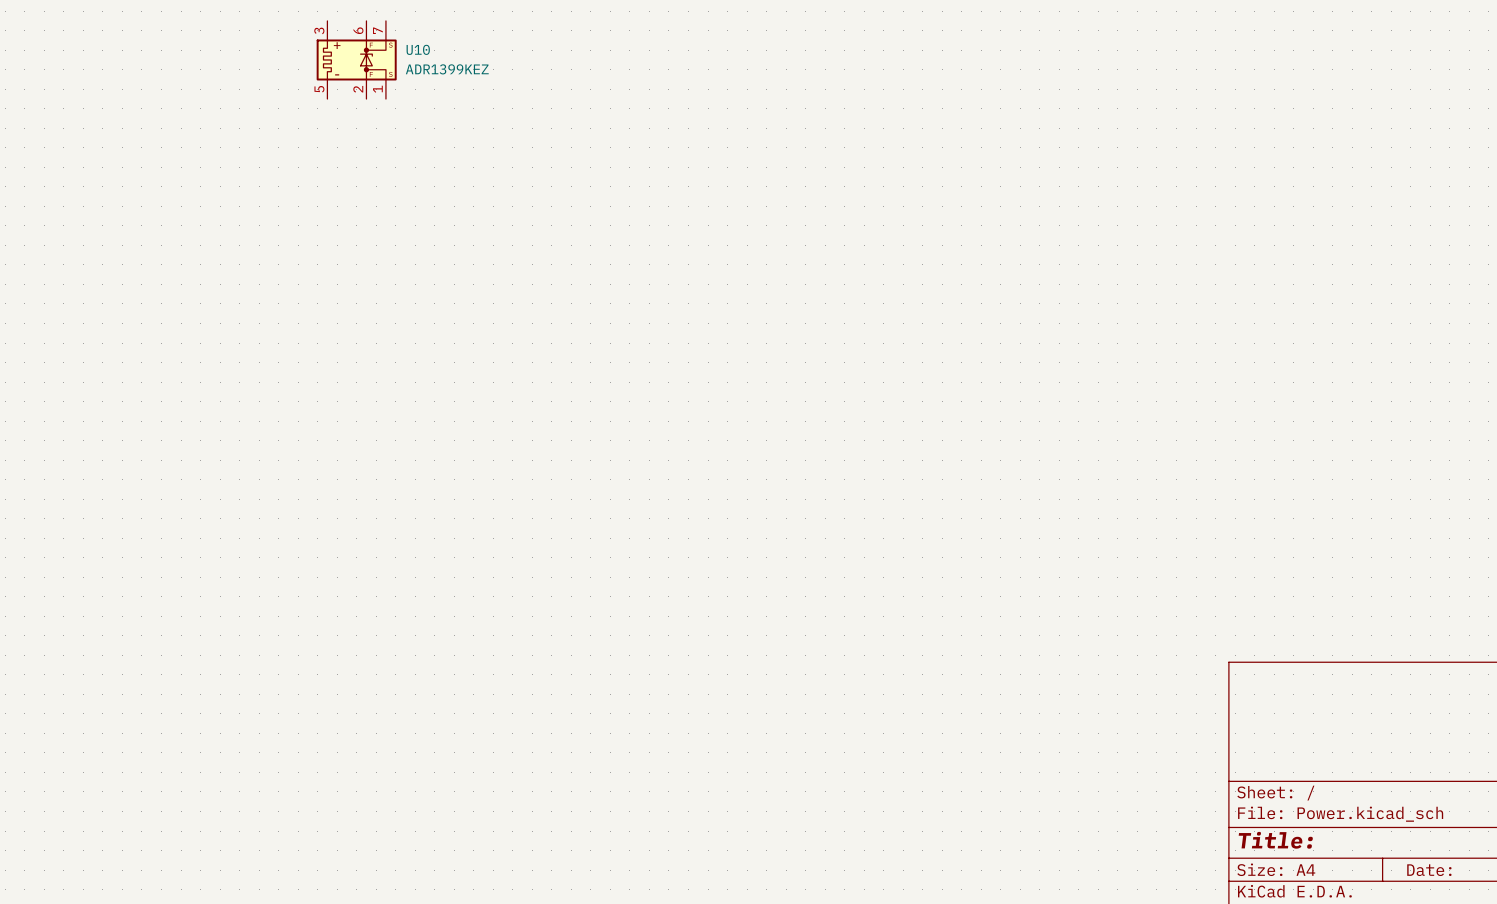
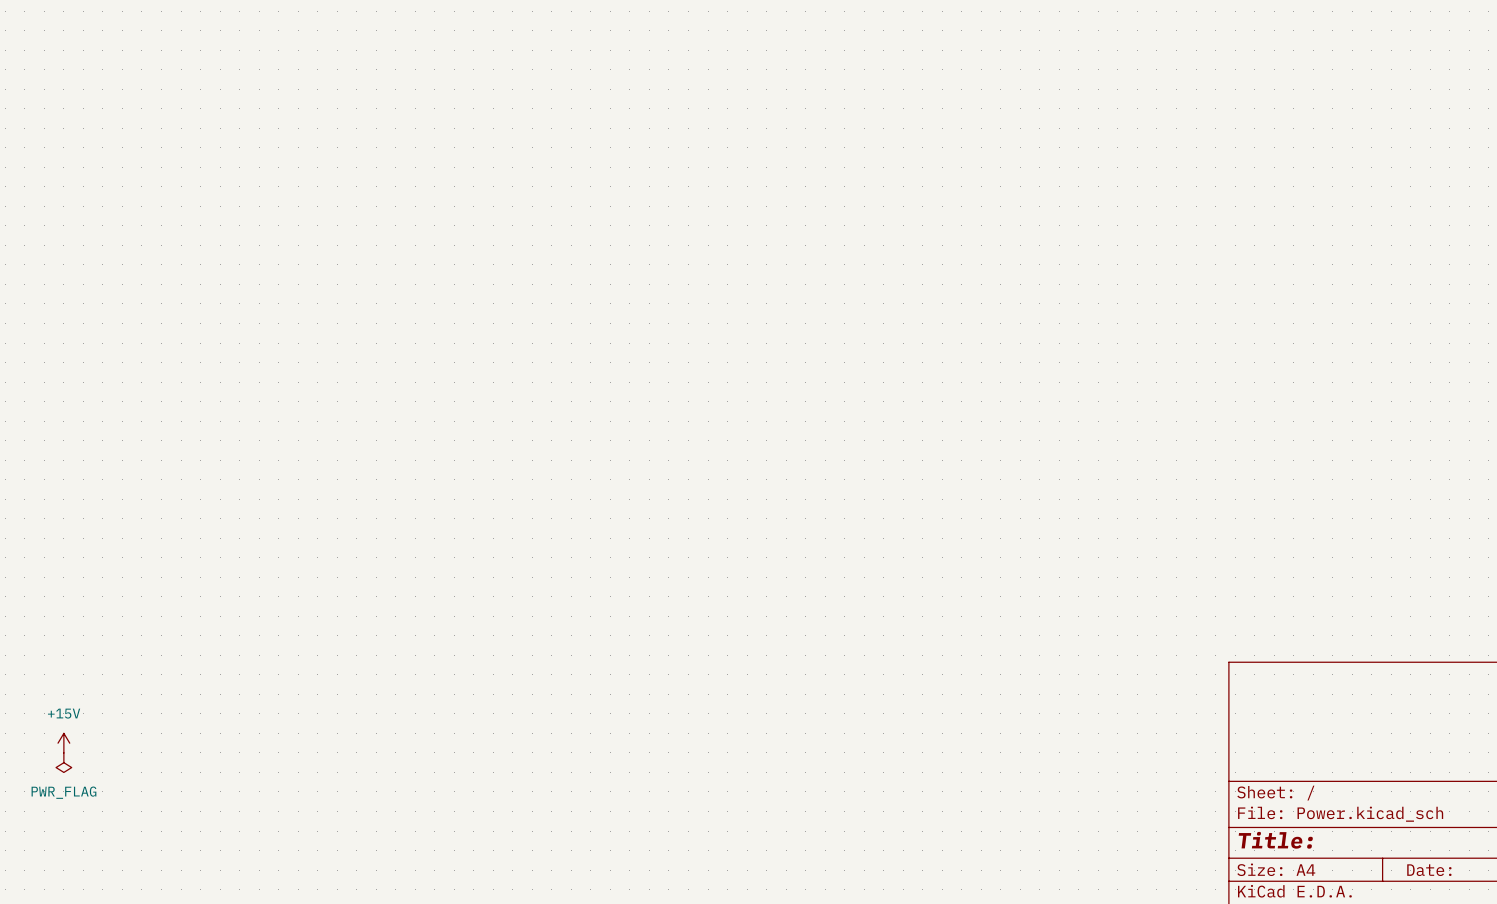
U10: ADR1399KEZ (356, 59) -> none
power symbol: none -> +15V (63, 743)
power symbol: none -> PWR_FLAG (63, 762)

